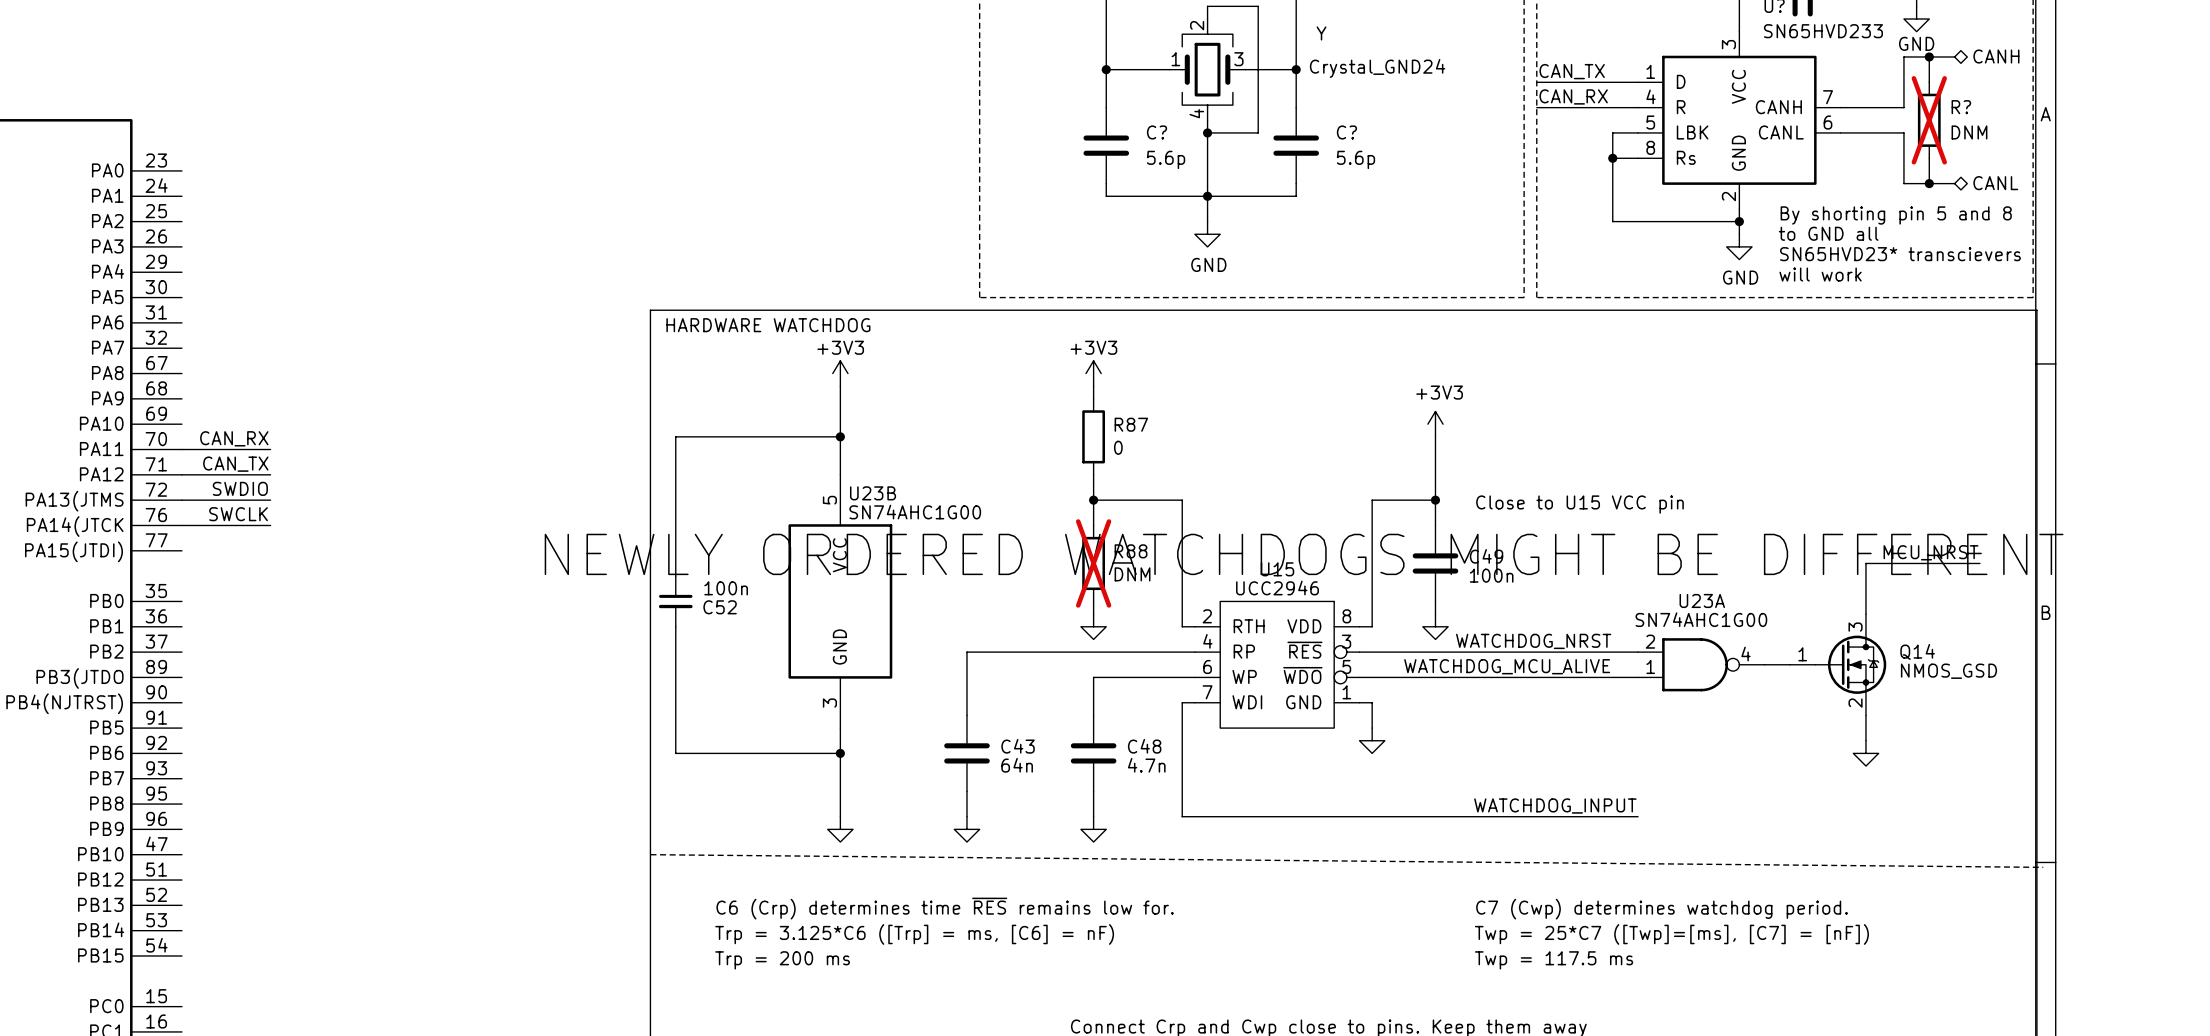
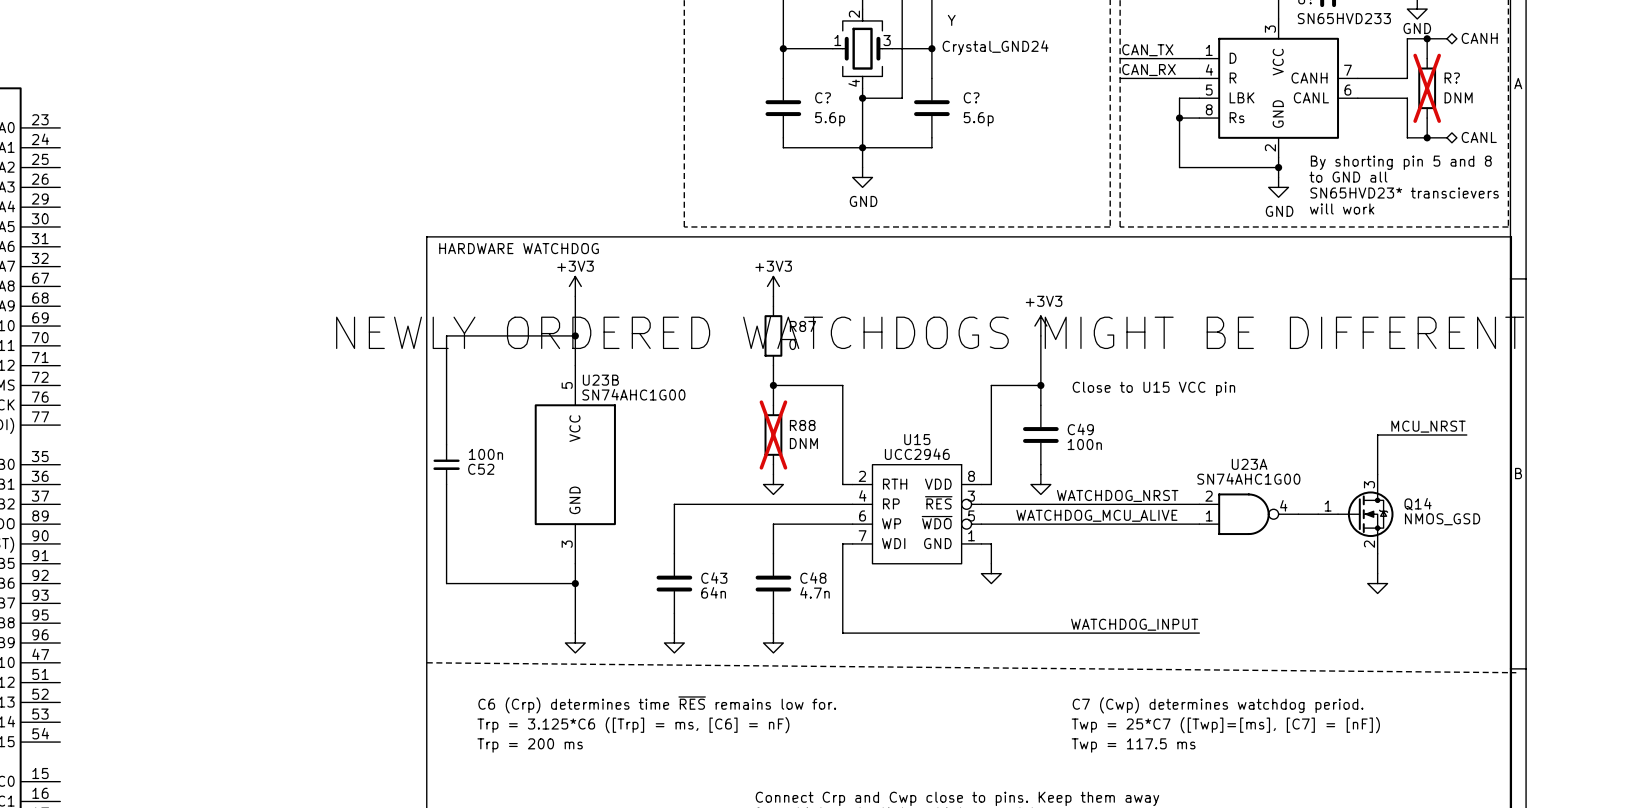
label: CAN_RX (234, 438) -> none
wire: (181, 449) (270, 449) -> none
label: CAN_TX (235, 464) -> none
wire: (181, 474) (270, 474) -> none
label: SWDIO (240, 488) -> none
wire: (181, 500) (270, 500) -> none
label: SWCLK (238, 514) -> none
wire: (181, 525) (270, 525) -> none
text position: NEWLY ORDERED WATCHDOGS MIGHT BE DIFFERENT (1304, 554) -> NEWLY ORDERED WATCHDOGS MIGHT BE DIFFERENT (930, 332)

